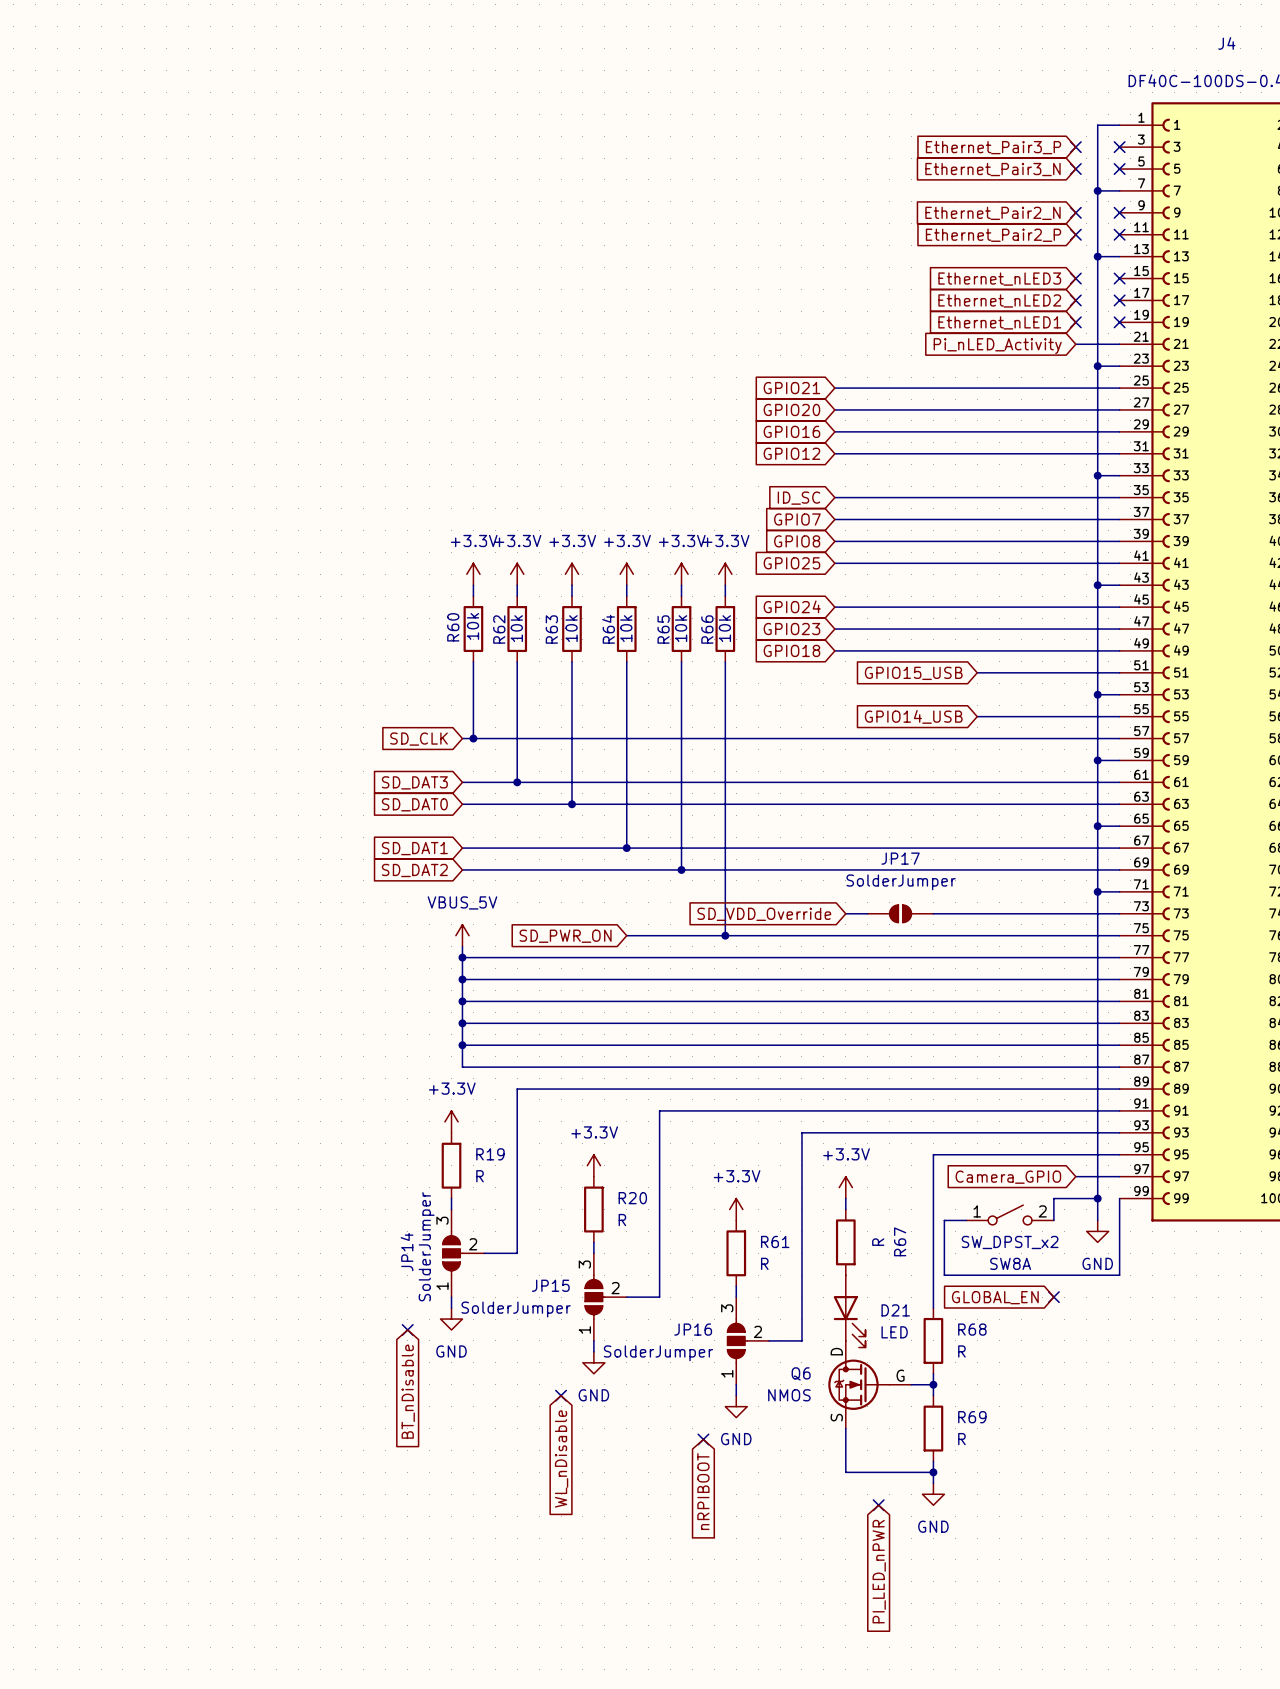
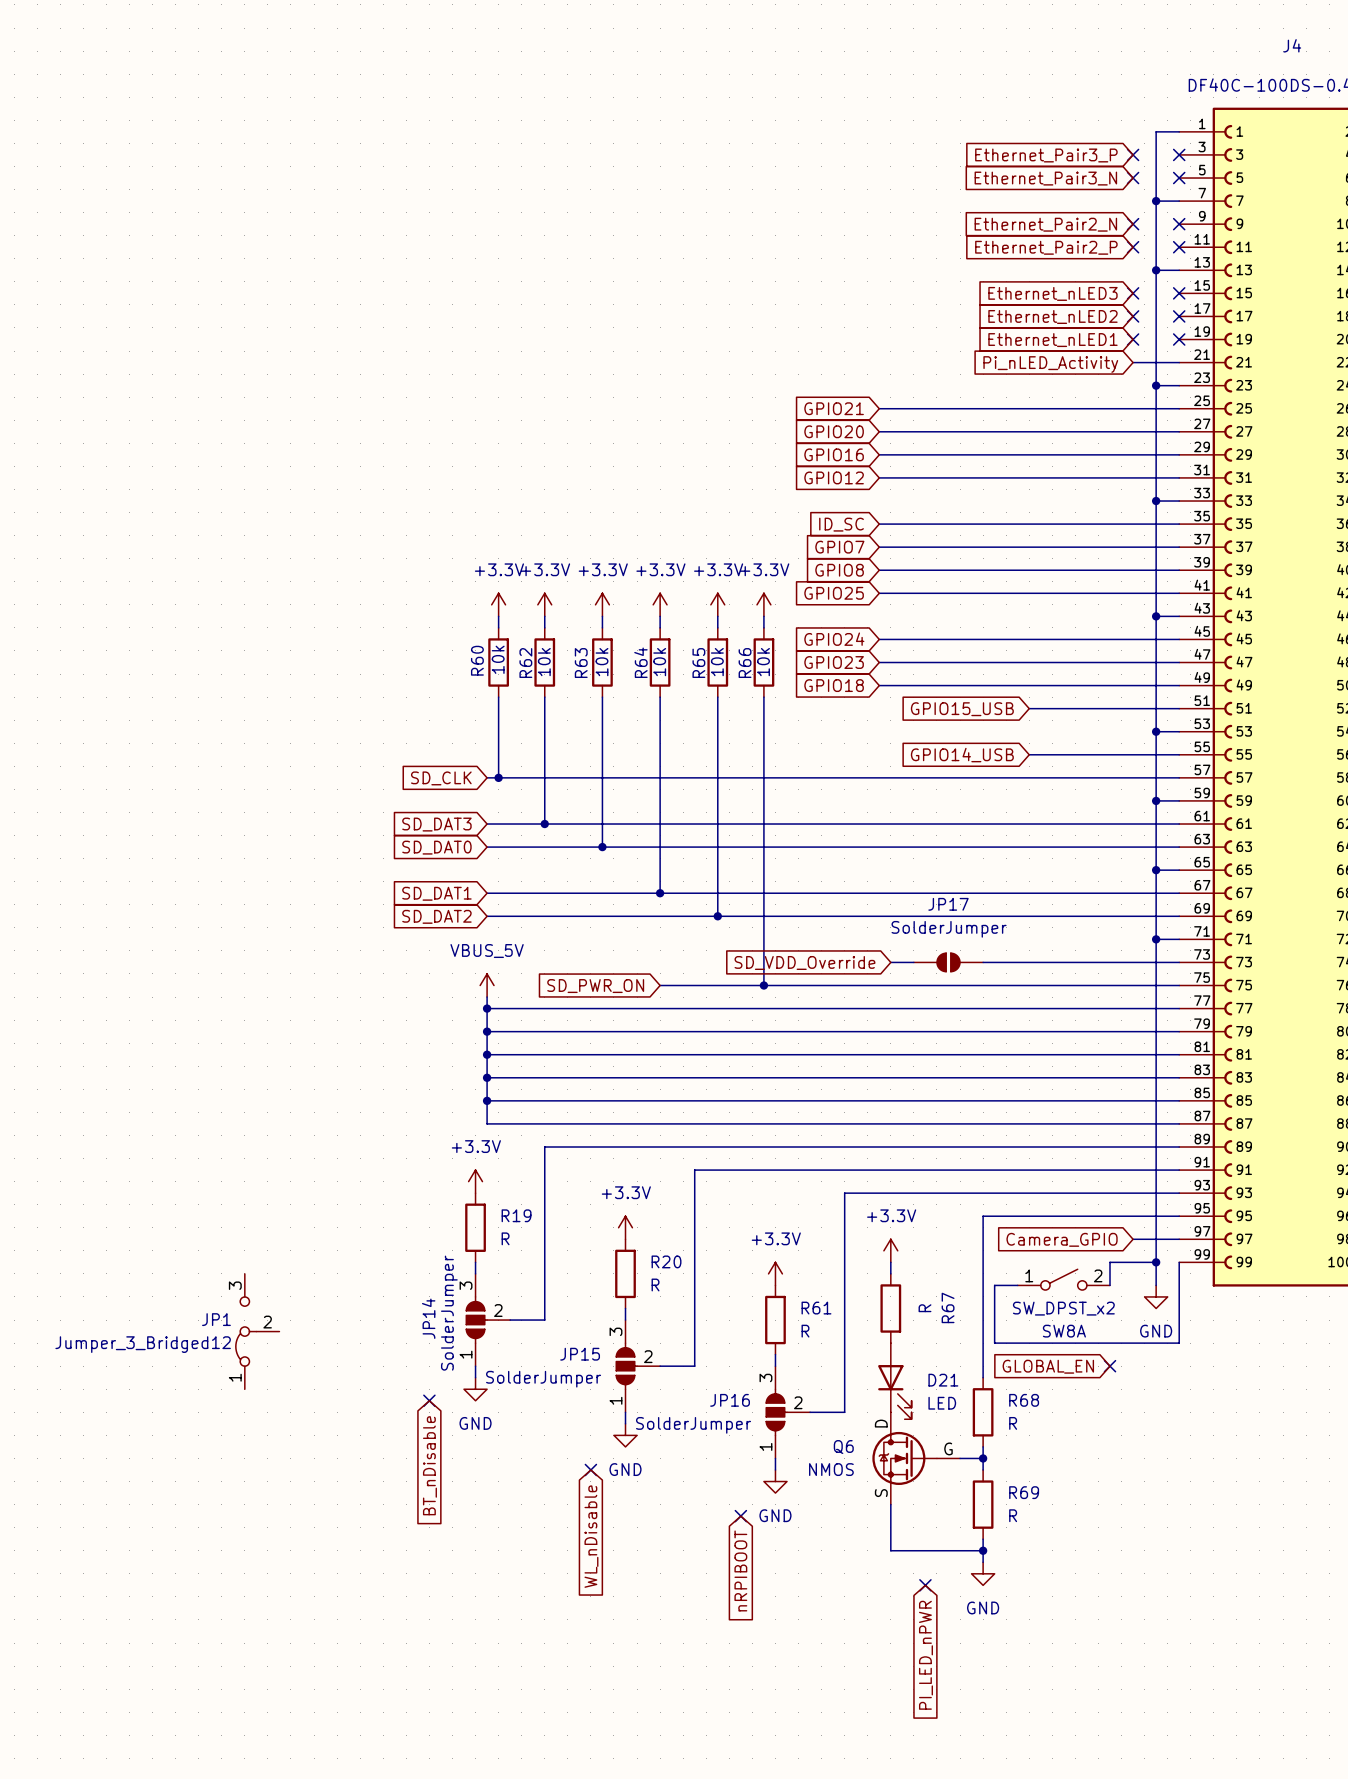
JP1: none -> Jumper_3_Bridged12 (257, 1331)

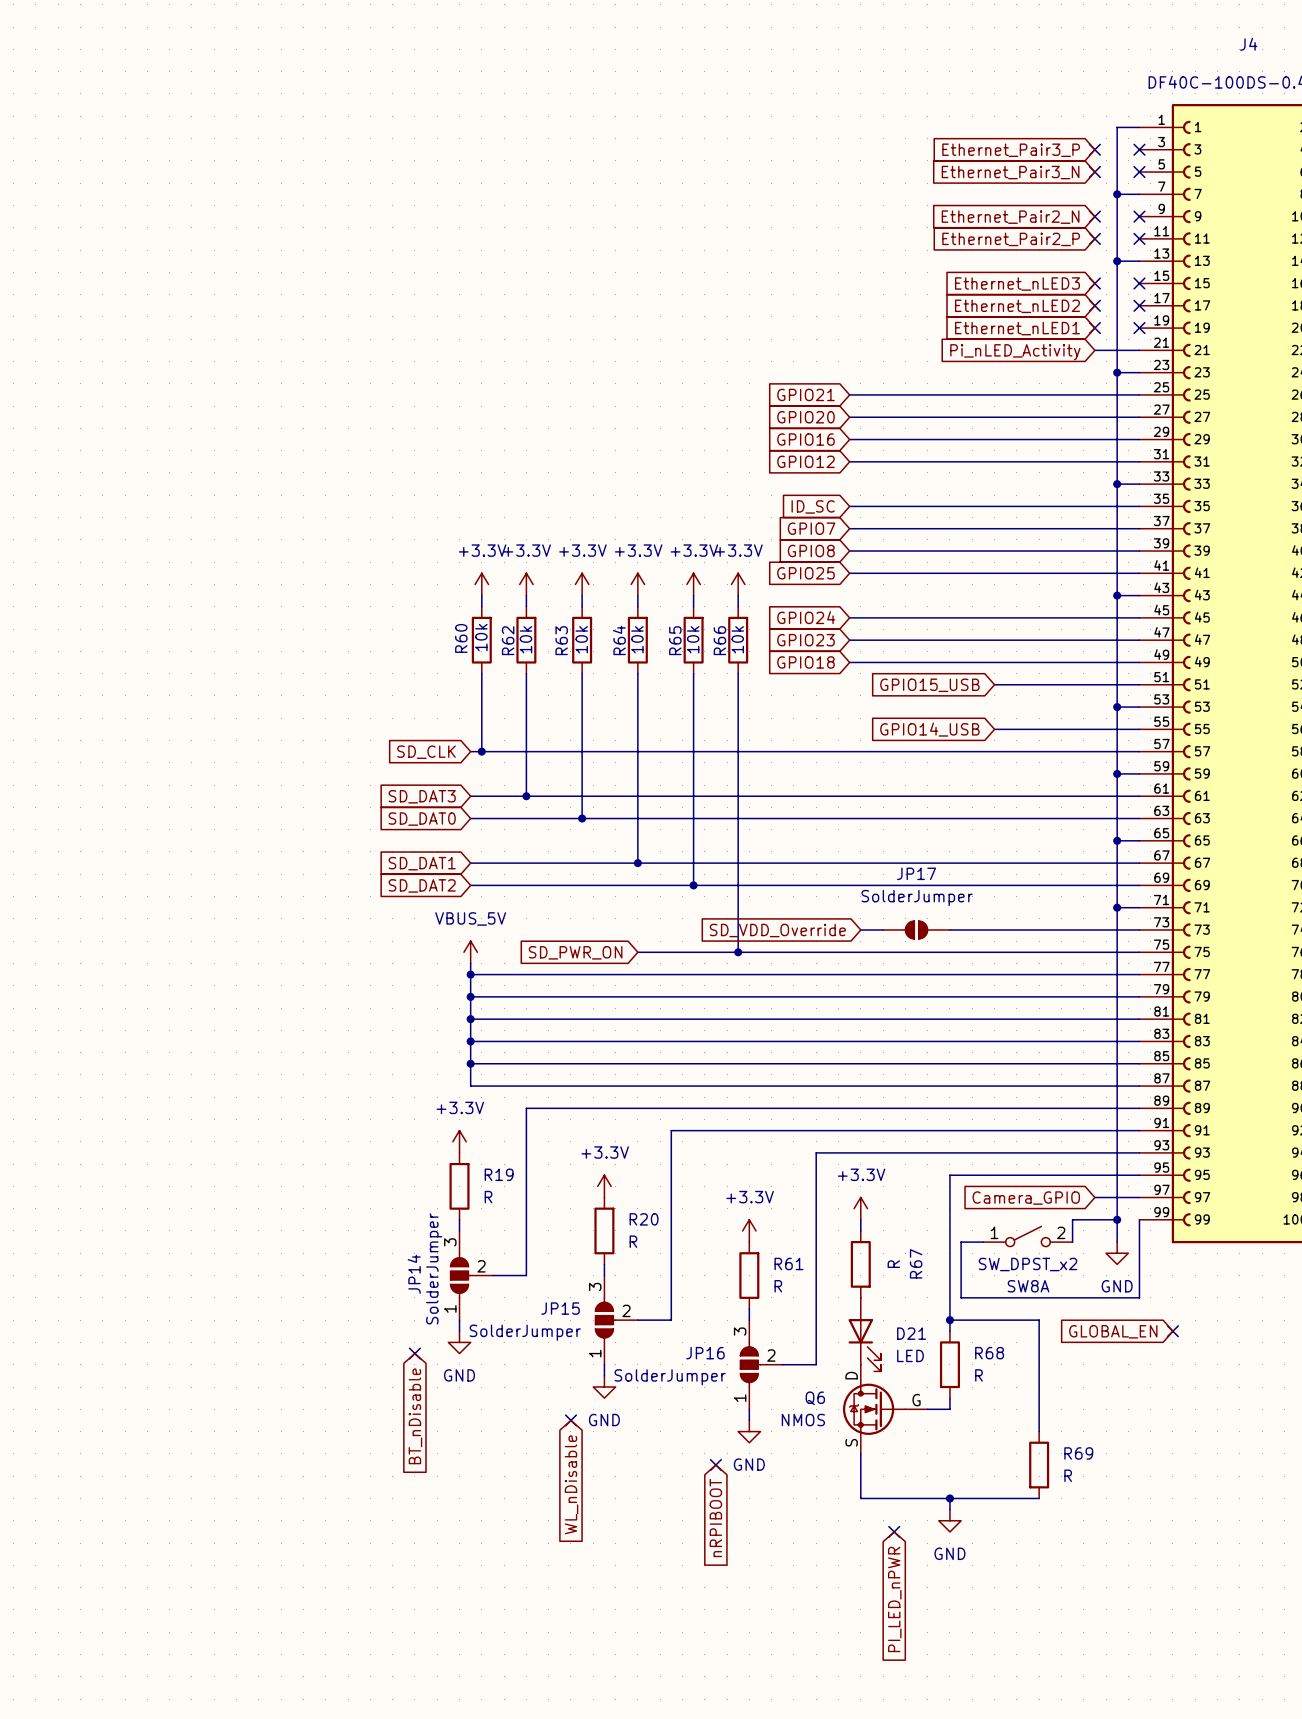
JP1: Jumper_3_Bridged12 (257, 1331) -> none
wire: none -> (949, 1320) (1039, 1320) (1039, 1431)
junction: none -> (949, 1320)
global label position: GLOBAL_EN (1048, 1366) -> GLOBAL_EN (1113, 1331)
no-connect mark: (1109, 1366) -> none
no-connect mark: none -> (1172, 1331)
wire: (983, 1458) (983, 1469) -> none
junction: (983, 1458) -> none
R69 position: (983, 1504) -> (1039, 1465)
wire: (983, 1539) (983, 1550) -> (1039, 1498) (949, 1498)

